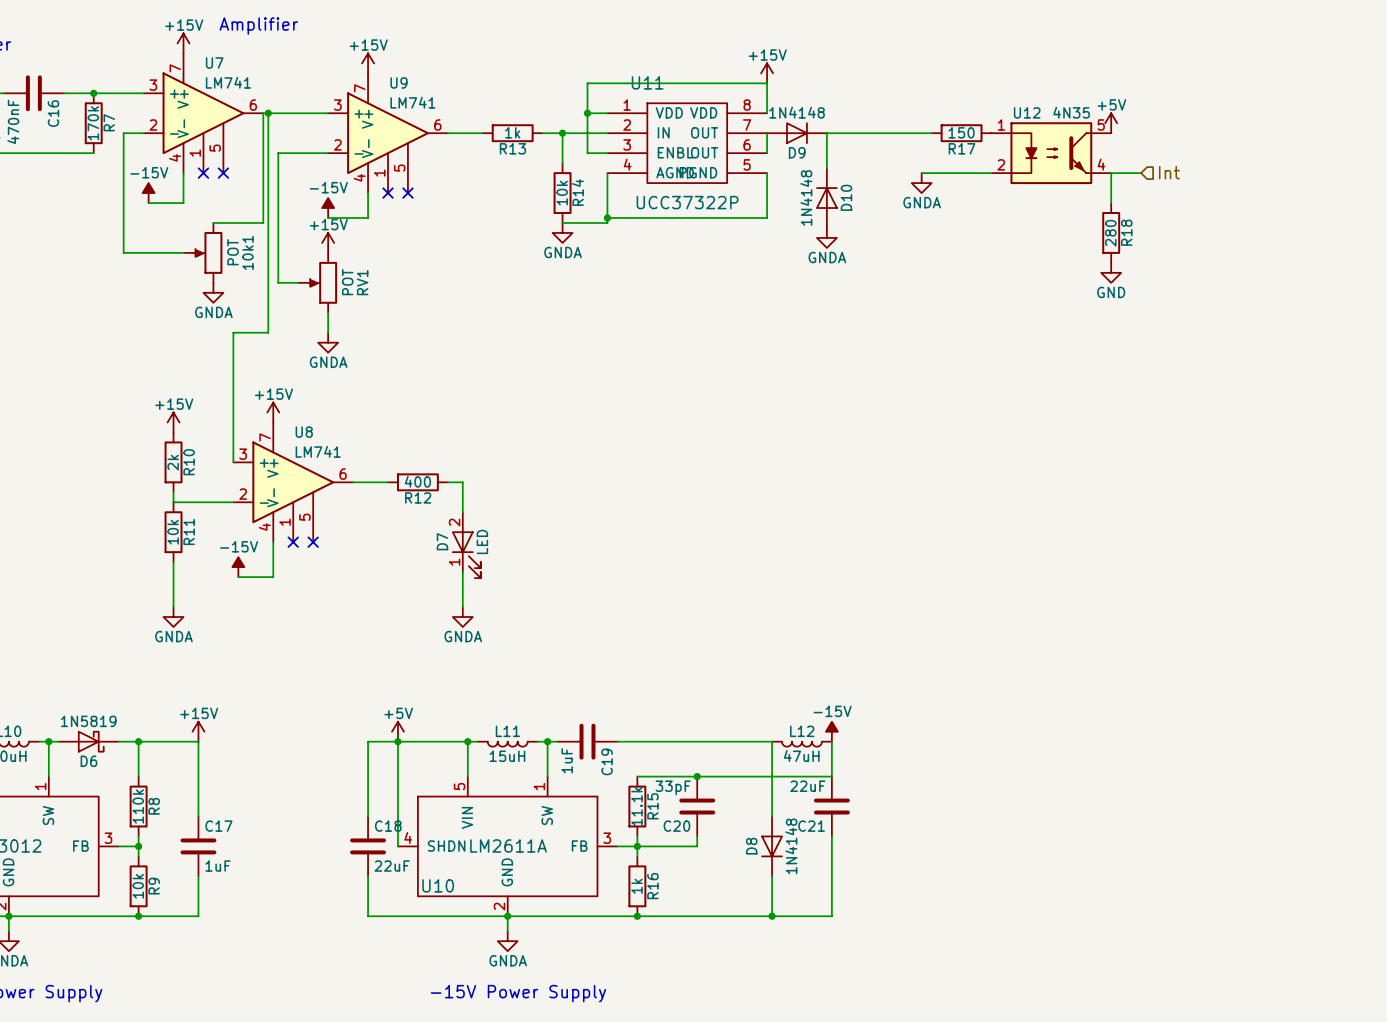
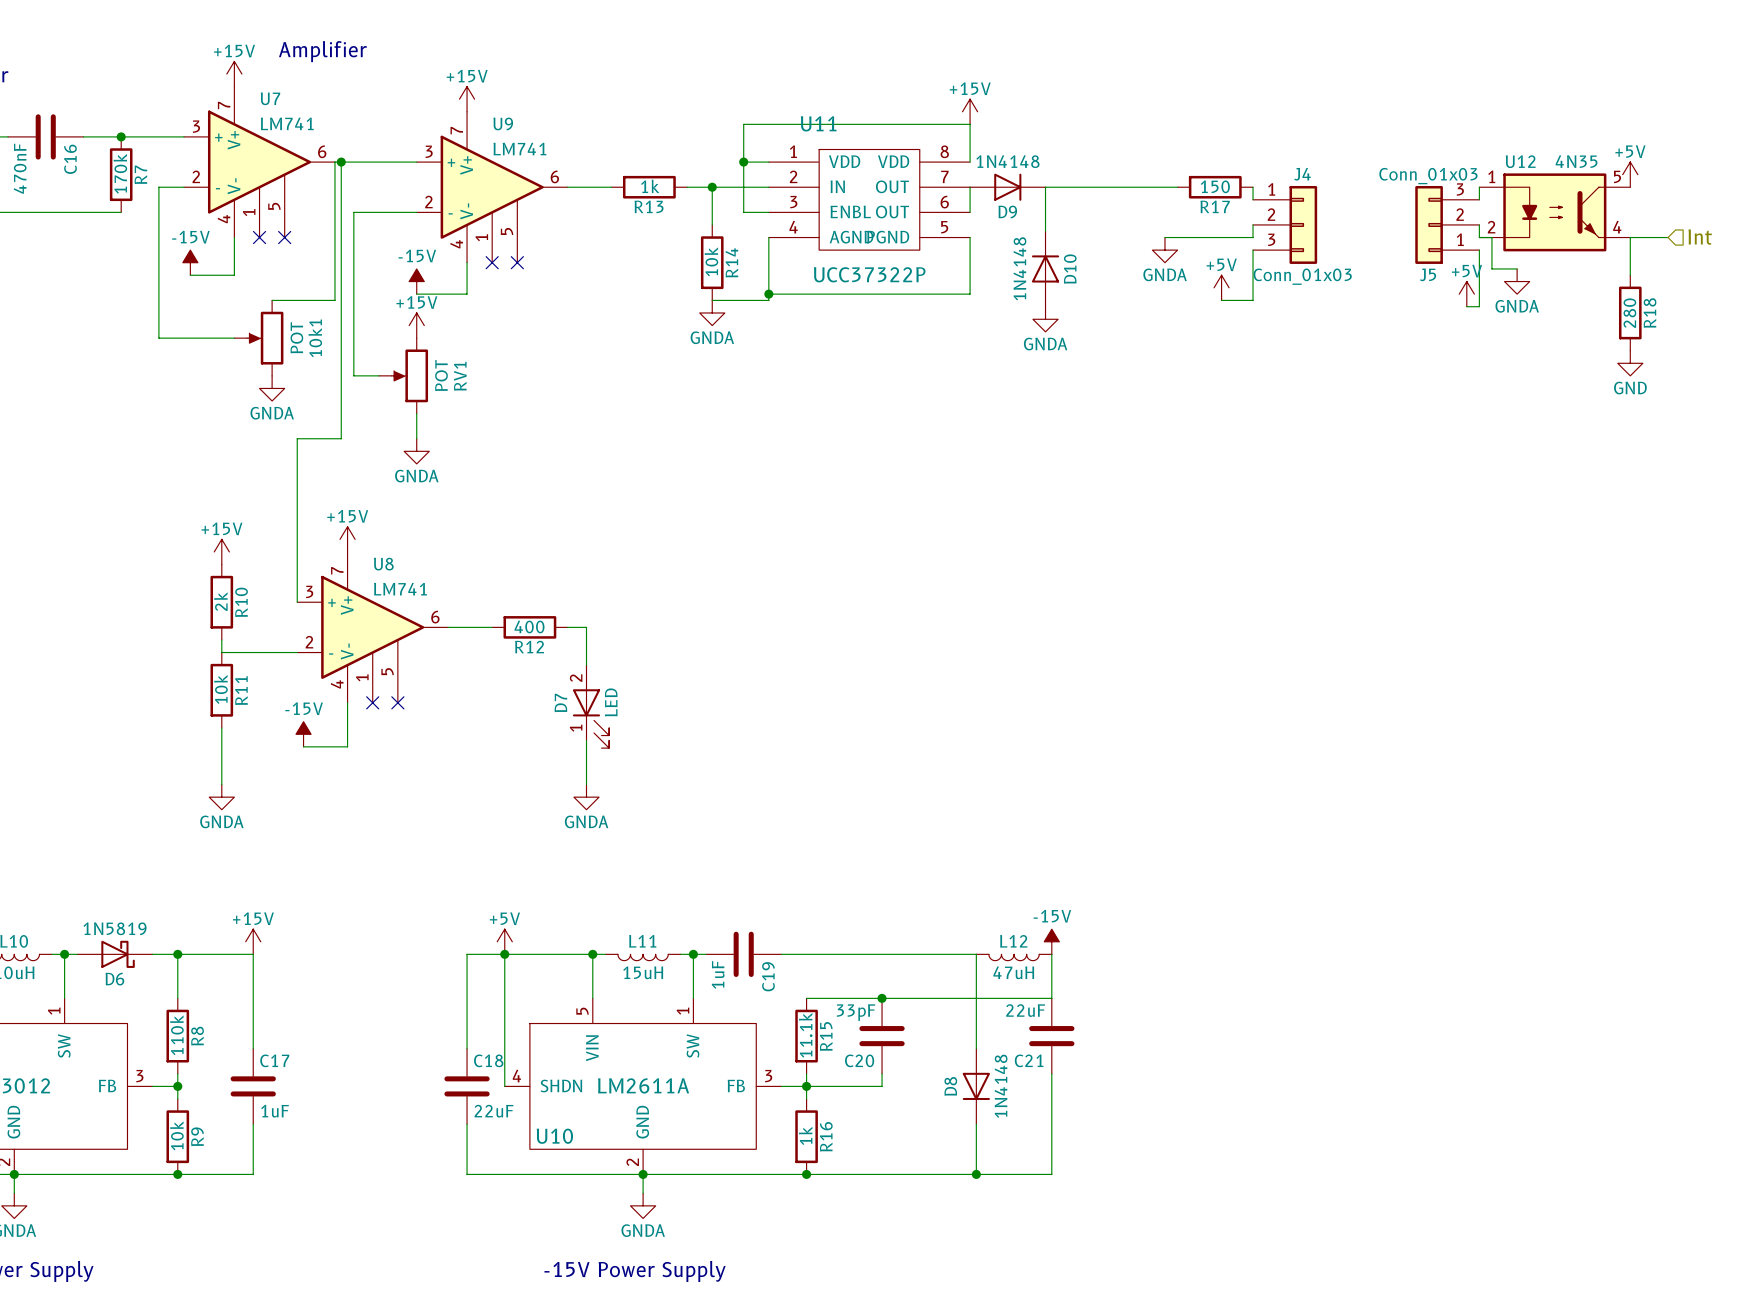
power symbol: +5V (1111, 123) -> none
power symbol: none -> +5V (1630, 174)
wire: none -> (1253, 187) (1253, 199)
wire: none -> (1479, 187) (1479, 199)
U12 position: (1051, 153) -> (1554, 212)
wire: none -> (1253, 224) (1253, 237)
J4: none -> Conn_01x03 (1285, 224)
J5: none -> Conn_01x03 (1447, 224)
wire: none -> (1479, 224) (1479, 237) (1491, 237) (1491, 268) (1517, 268)
hierarchical label position: Int (1169, 172) -> Int (1700, 237)
wire: (1141, 173) (1111, 173) (1111, 203) -> (1668, 237) (1630, 237) (1630, 275)
wire: none -> (1253, 250) (1253, 300) (1221, 300)
wire: none -> (1479, 250) (1479, 306) (1466, 306)
power symbol: none -> GNDA (1517, 281)
power symbol: none -> +5V (1221, 287)
power symbol: none -> +5V (1466, 294)
R18 position: (1111, 232) -> (1630, 312)
power symbol position: GND (1111, 272) -> GND (1630, 363)

